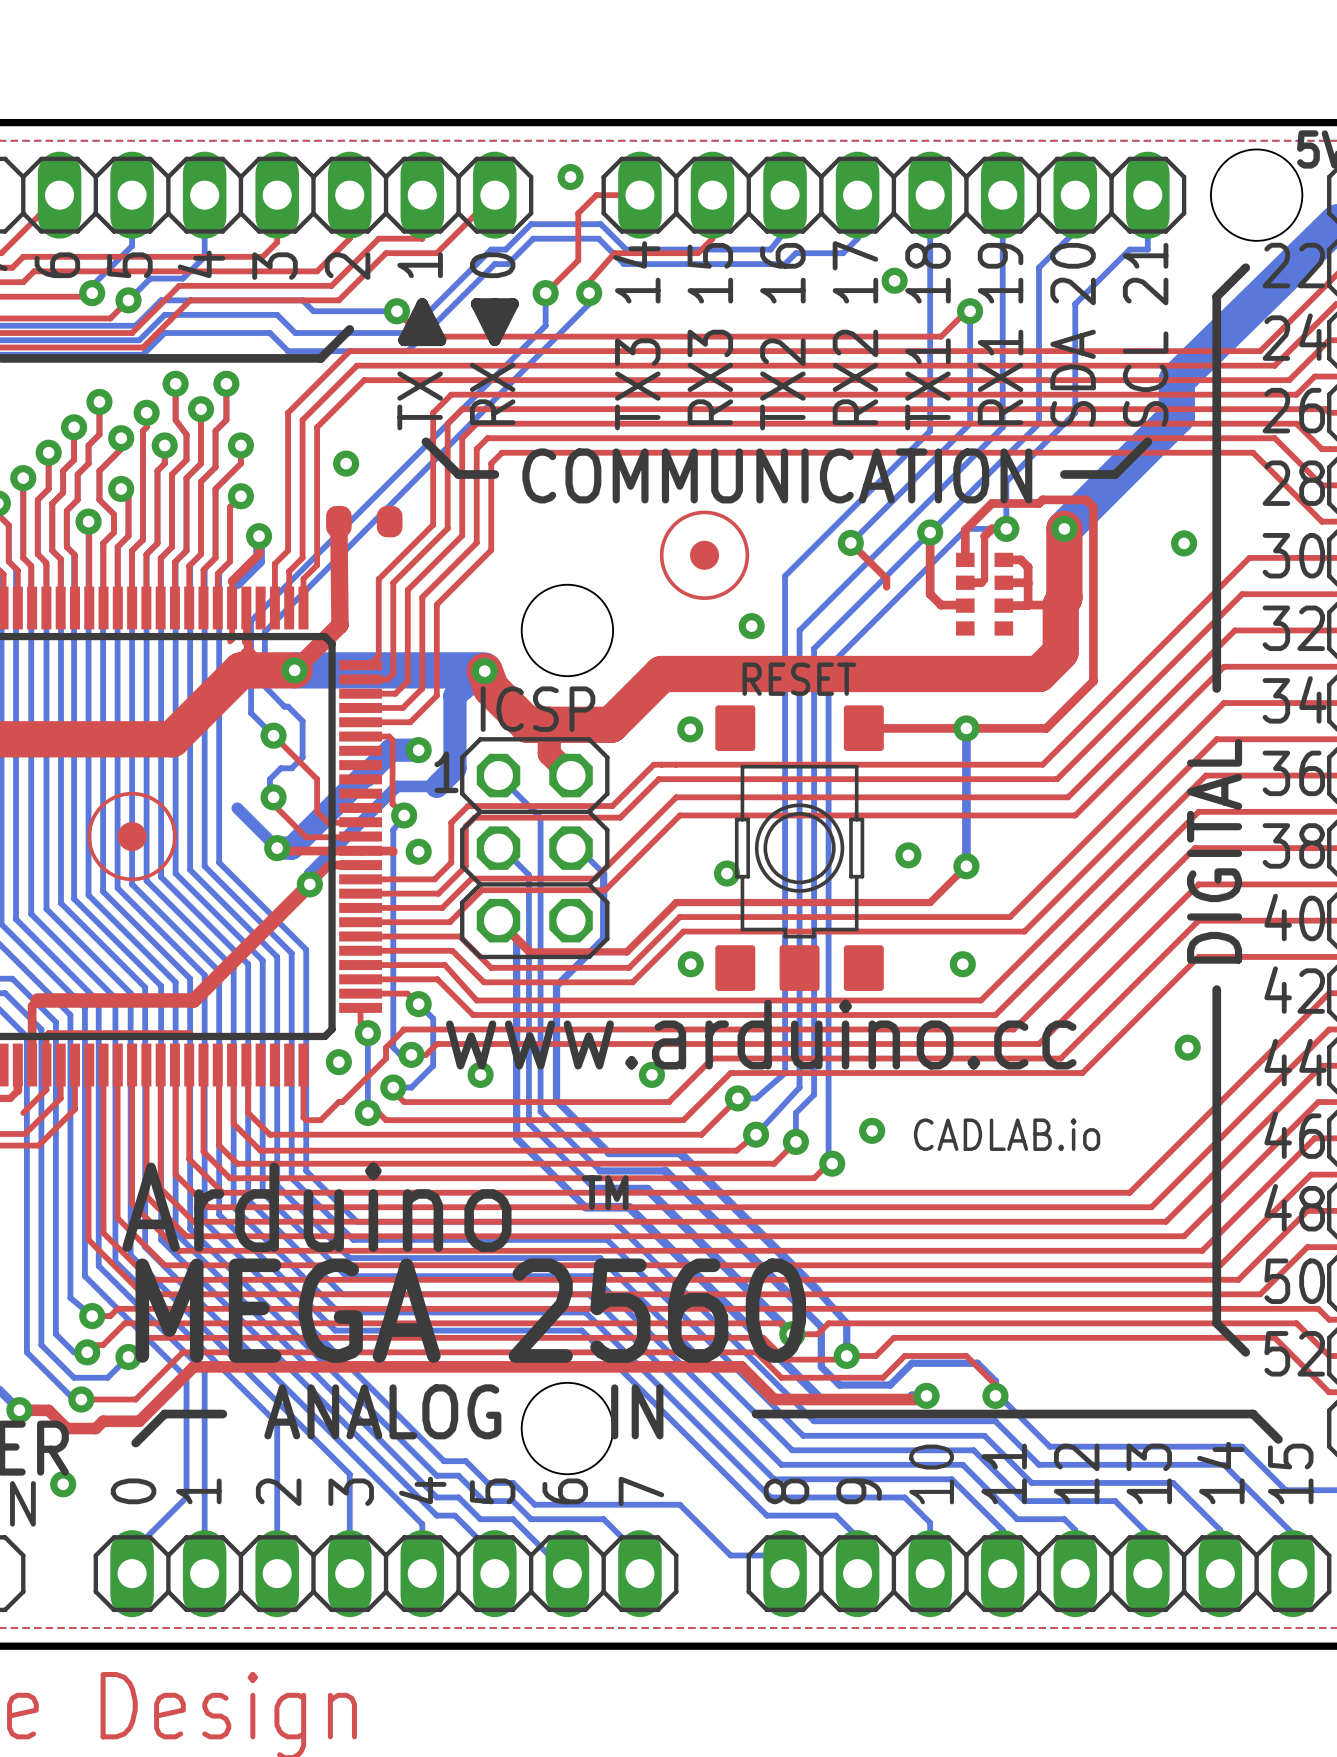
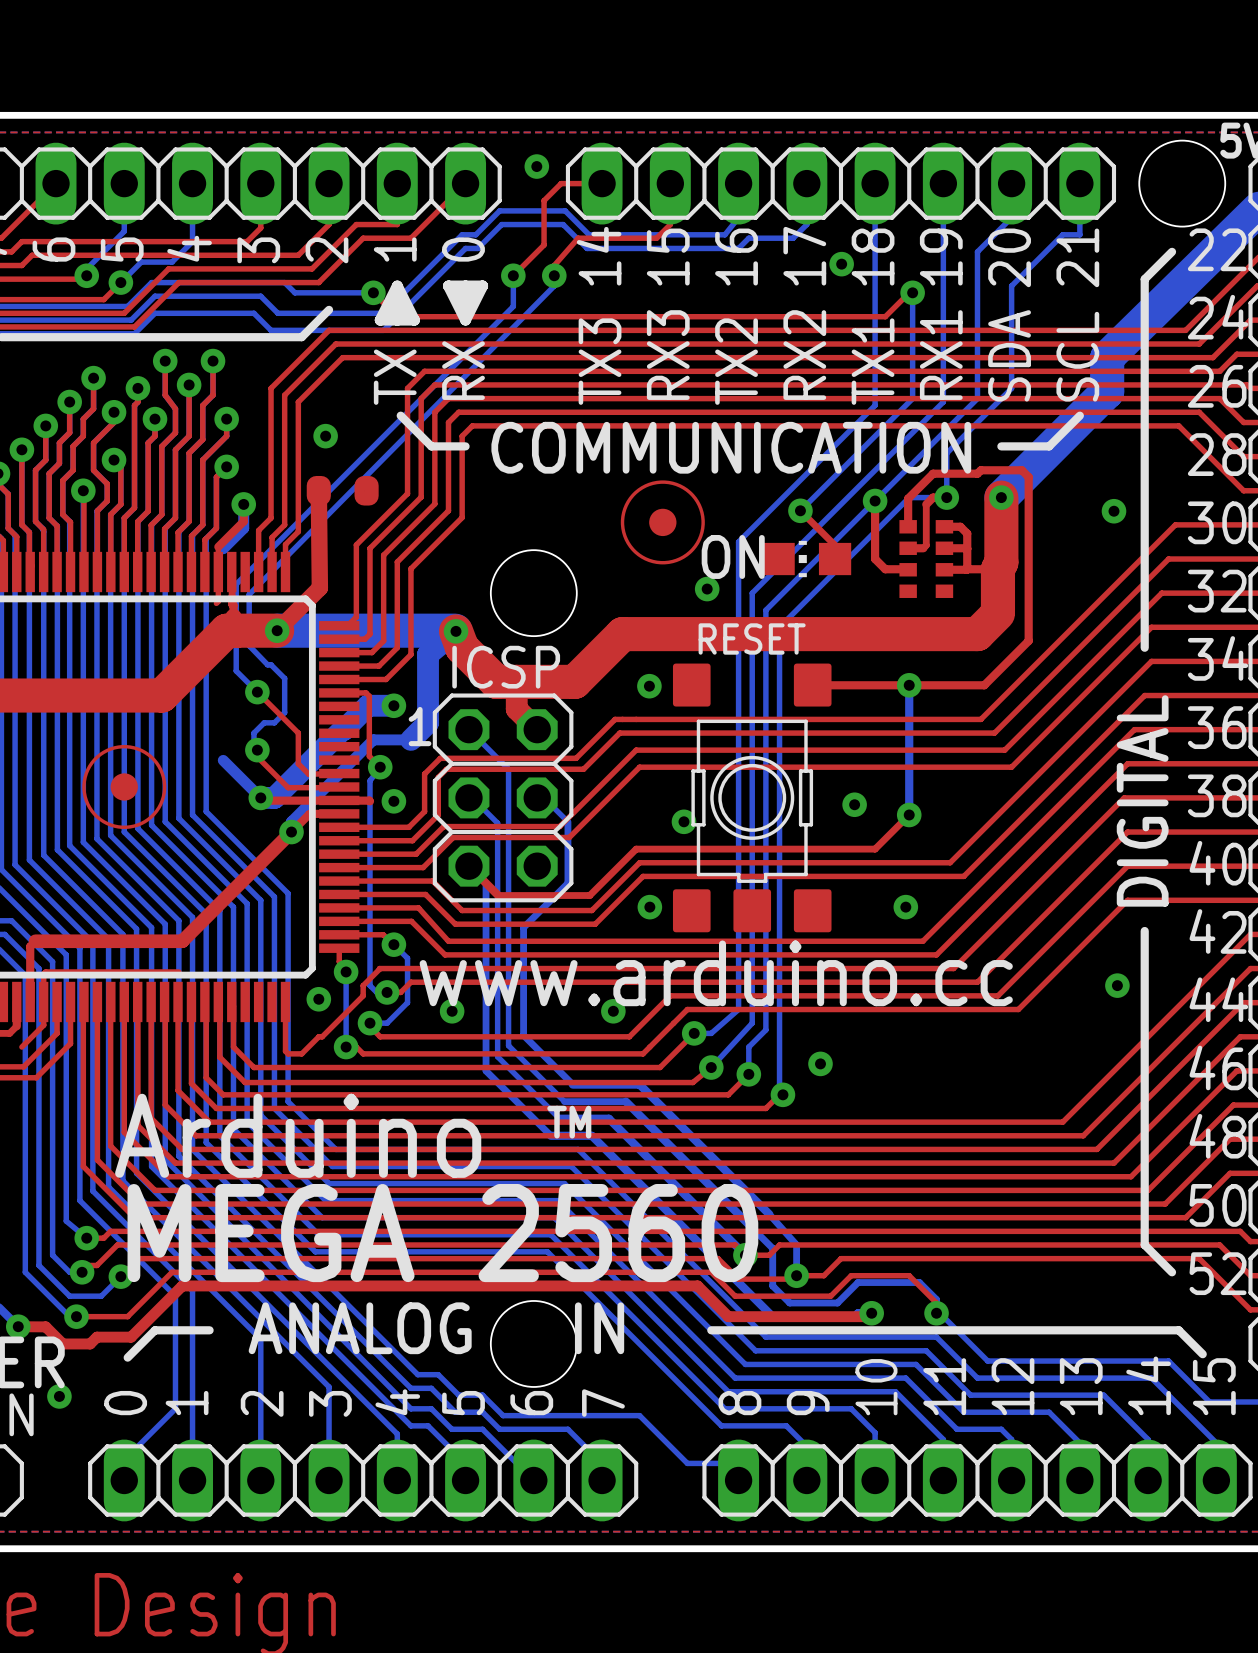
ON: none -> (806, 559)
text: CADLAB.io (1007, 1134) -> none

